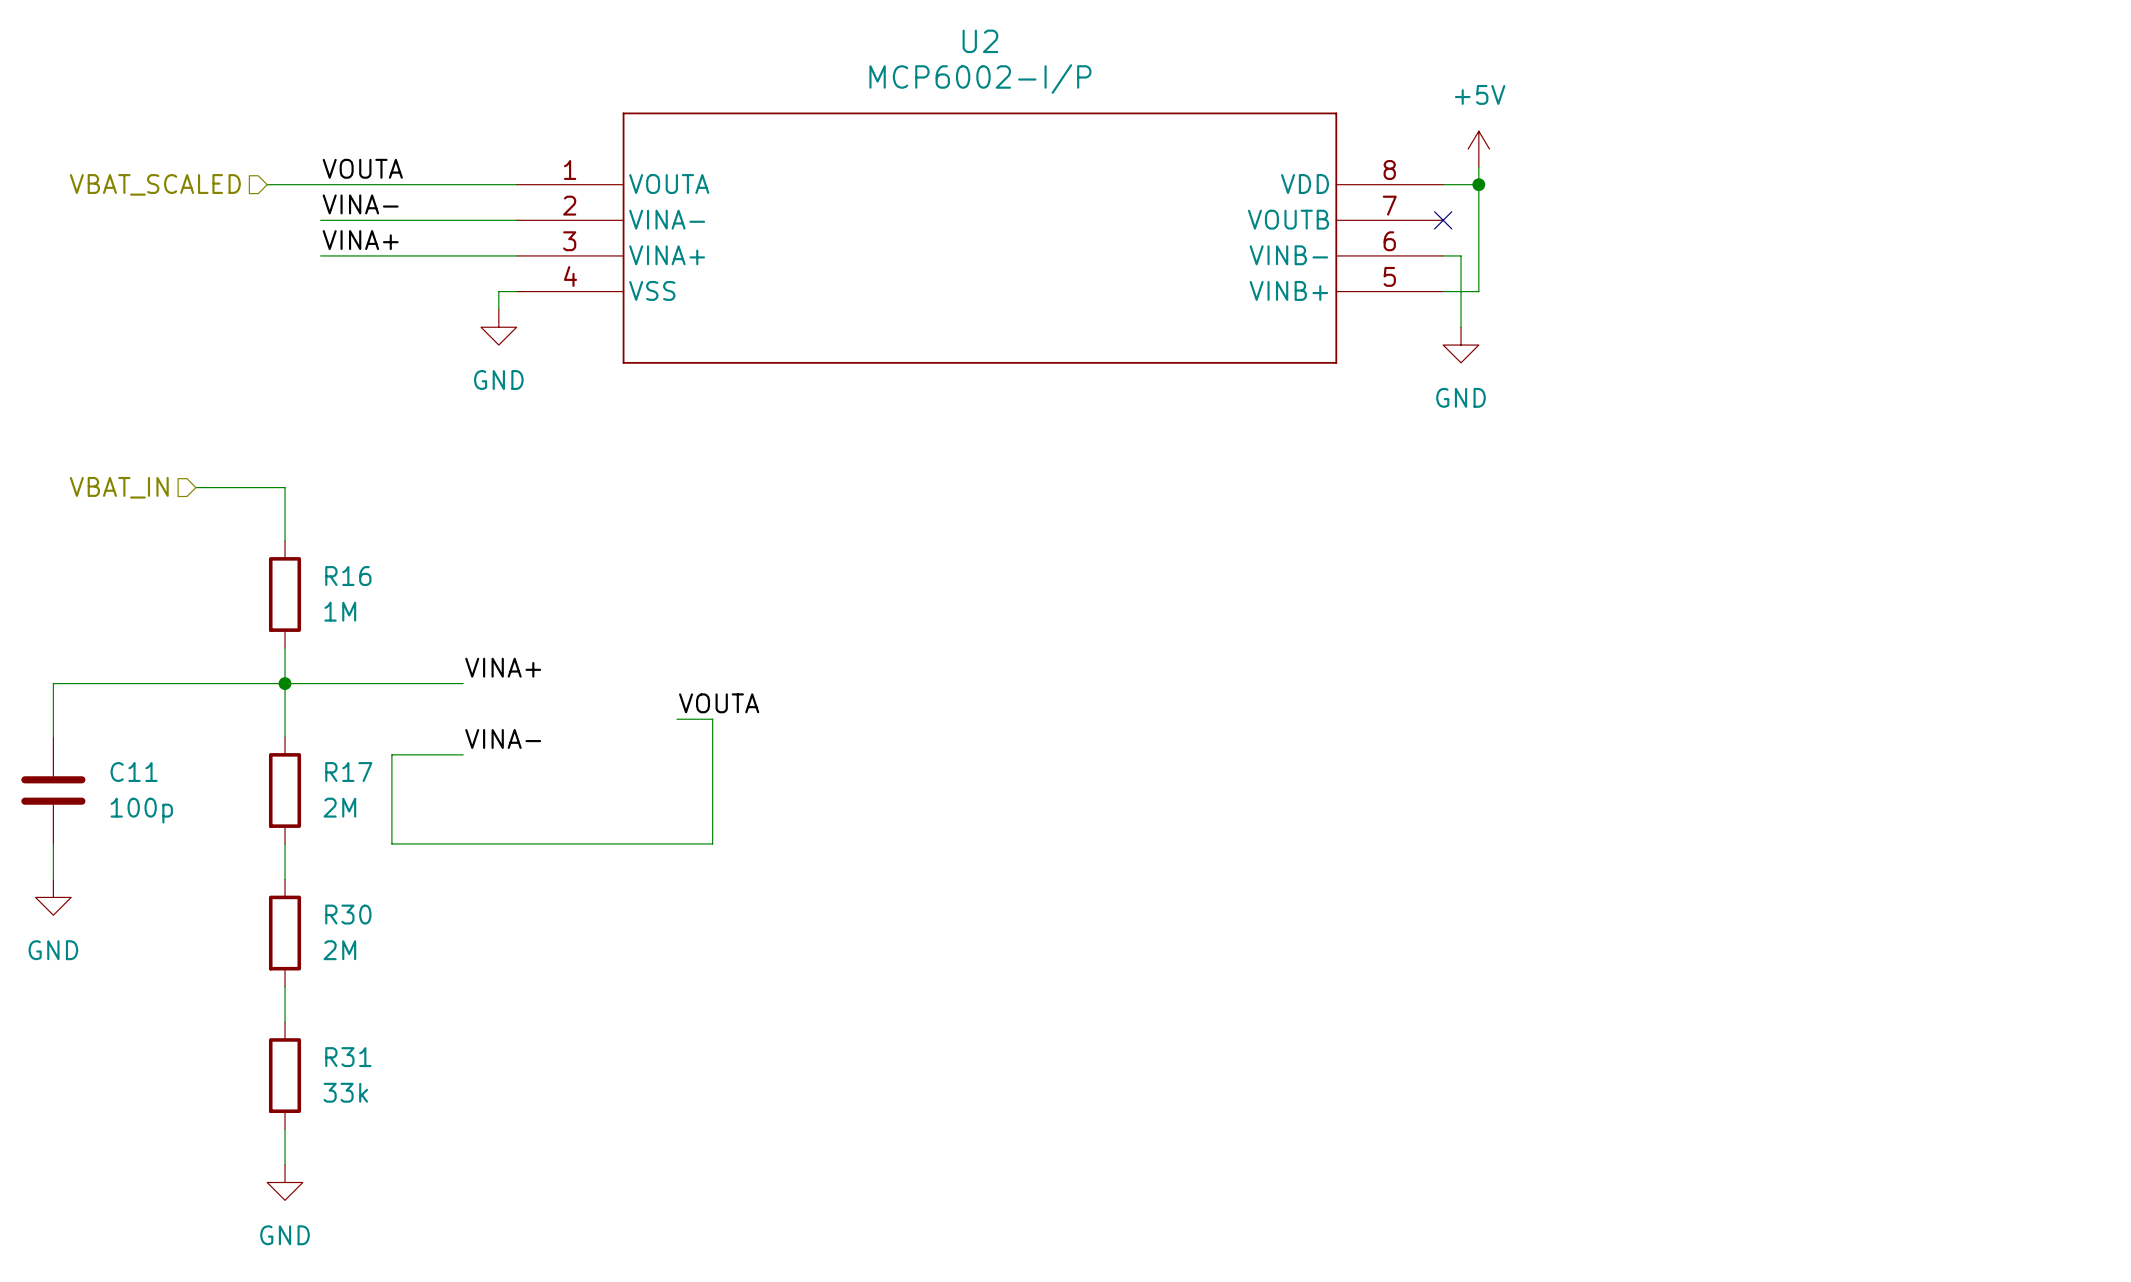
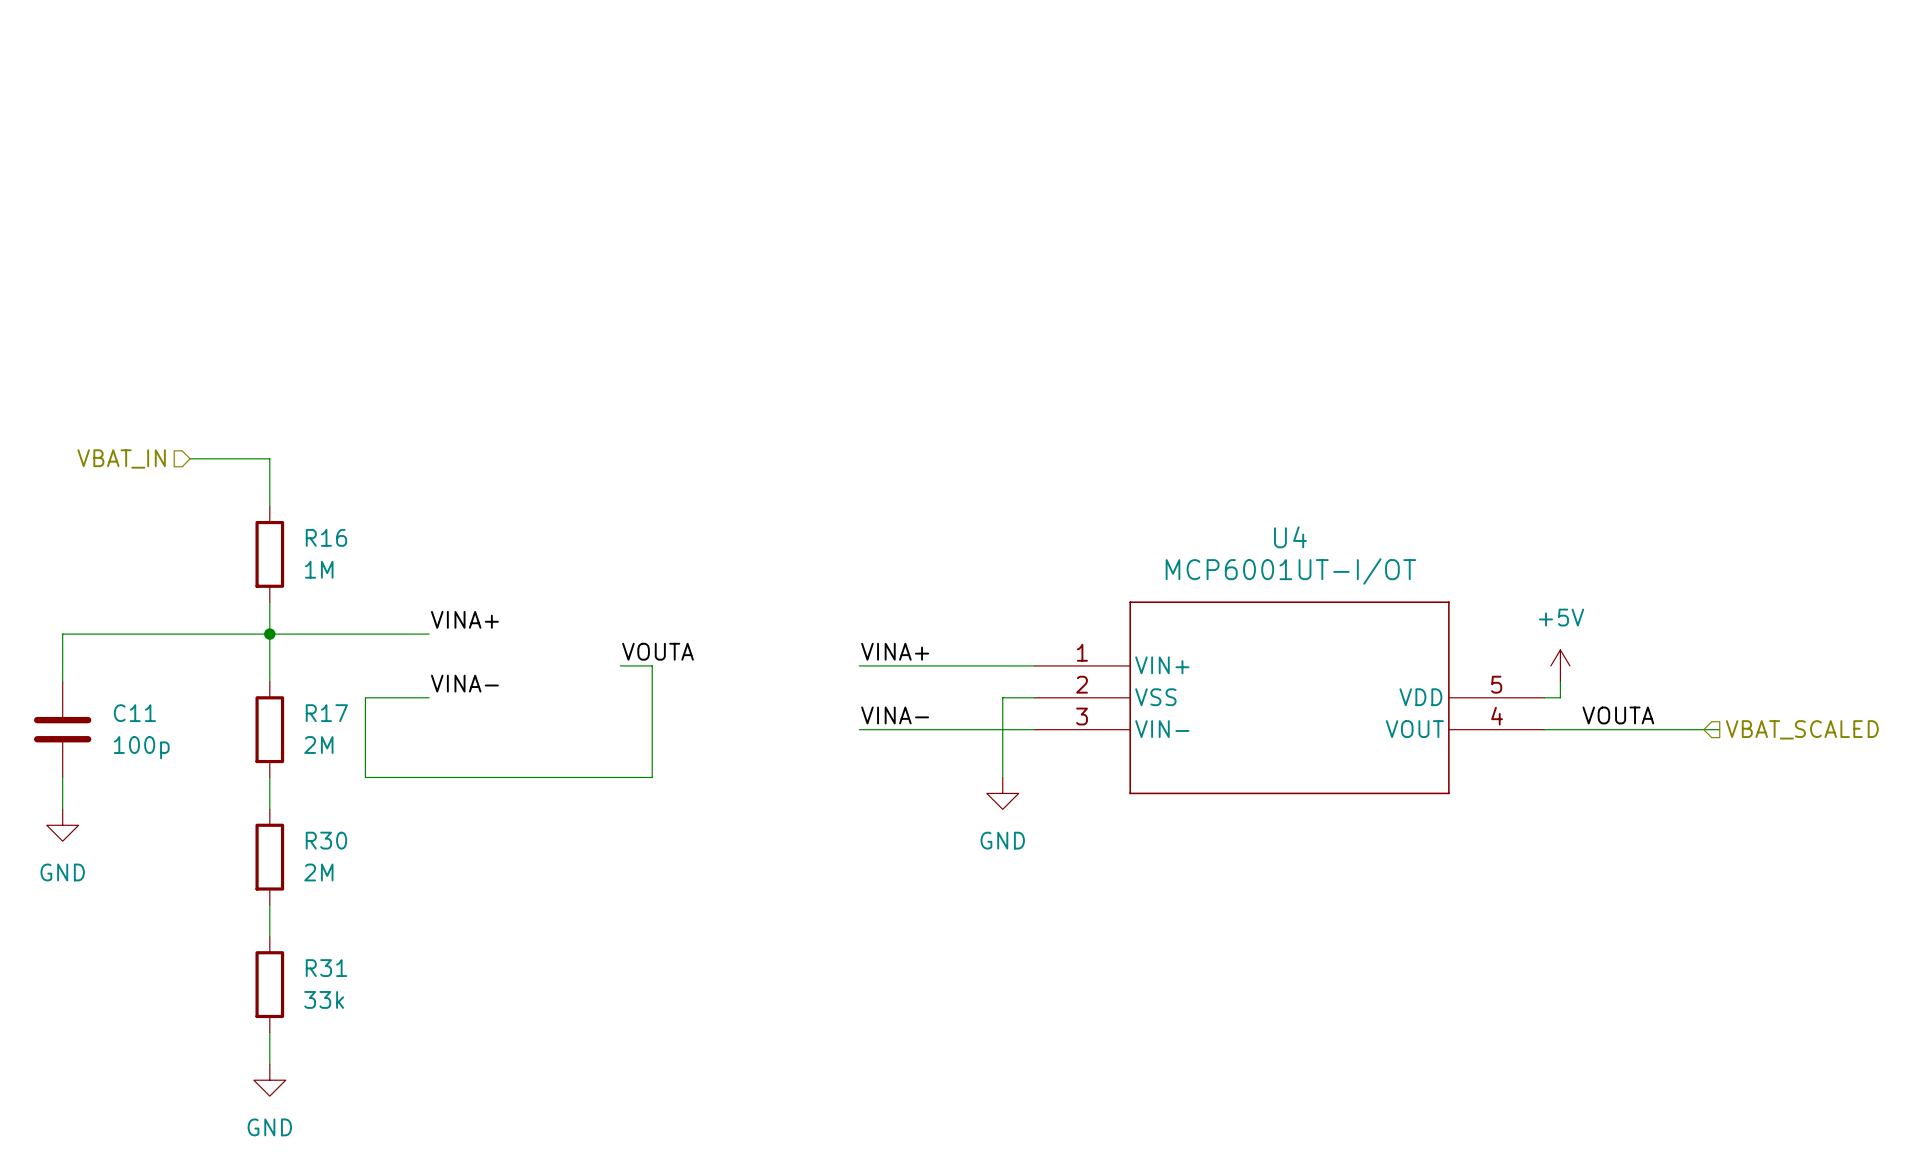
power symbol: +5V (1478, 149) -> none
wire: (1478, 166) (1478, 291) (1443, 291) -> none
label: VOUTA (362, 168) -> none
hierarchical label: VBAT_SCALED (155, 184) -> none
wire: (267, 184) (516, 184) -> none
wire: (1443, 184) (1478, 184) -> none
junction: (1478, 184) -> none
label: VINA- (360, 204) -> none
wire: (320, 220) (516, 220) -> none
no-connect mark: (1443, 220) -> none
U2: MCP6002-I/P (979, 238) -> none
label: VINA+ (360, 240) -> none
wire: (320, 255) (516, 255) -> none
wire: (1443, 255) (1461, 255) (1461, 327) -> none
wire: (516, 291) (498, 291) (498, 309) -> none
power symbol: GND (498, 327) -> none
power symbol: GND (1461, 345) -> none
label: none -> VINA+ (895, 651)
wire: none -> (859, 665) (1034, 665)
power symbol: none -> +5V (1560, 665)
wire: none -> (1560, 681) (1560, 697) (1544, 697)
wire: none -> (1034, 697) (1002, 697) (1002, 777)
U4: none -> MCP6001UT-I/OT (1289, 697)
label: none -> VINA- (895, 715)
label: none -> VOUTA (1618, 715)
wire: none -> (859, 729) (1034, 729)
wire: none -> (1544, 729) (1719, 729)
hierarchical label: none -> VBAT_SCALED (1802, 729)
power symbol: none -> GND (1002, 793)

